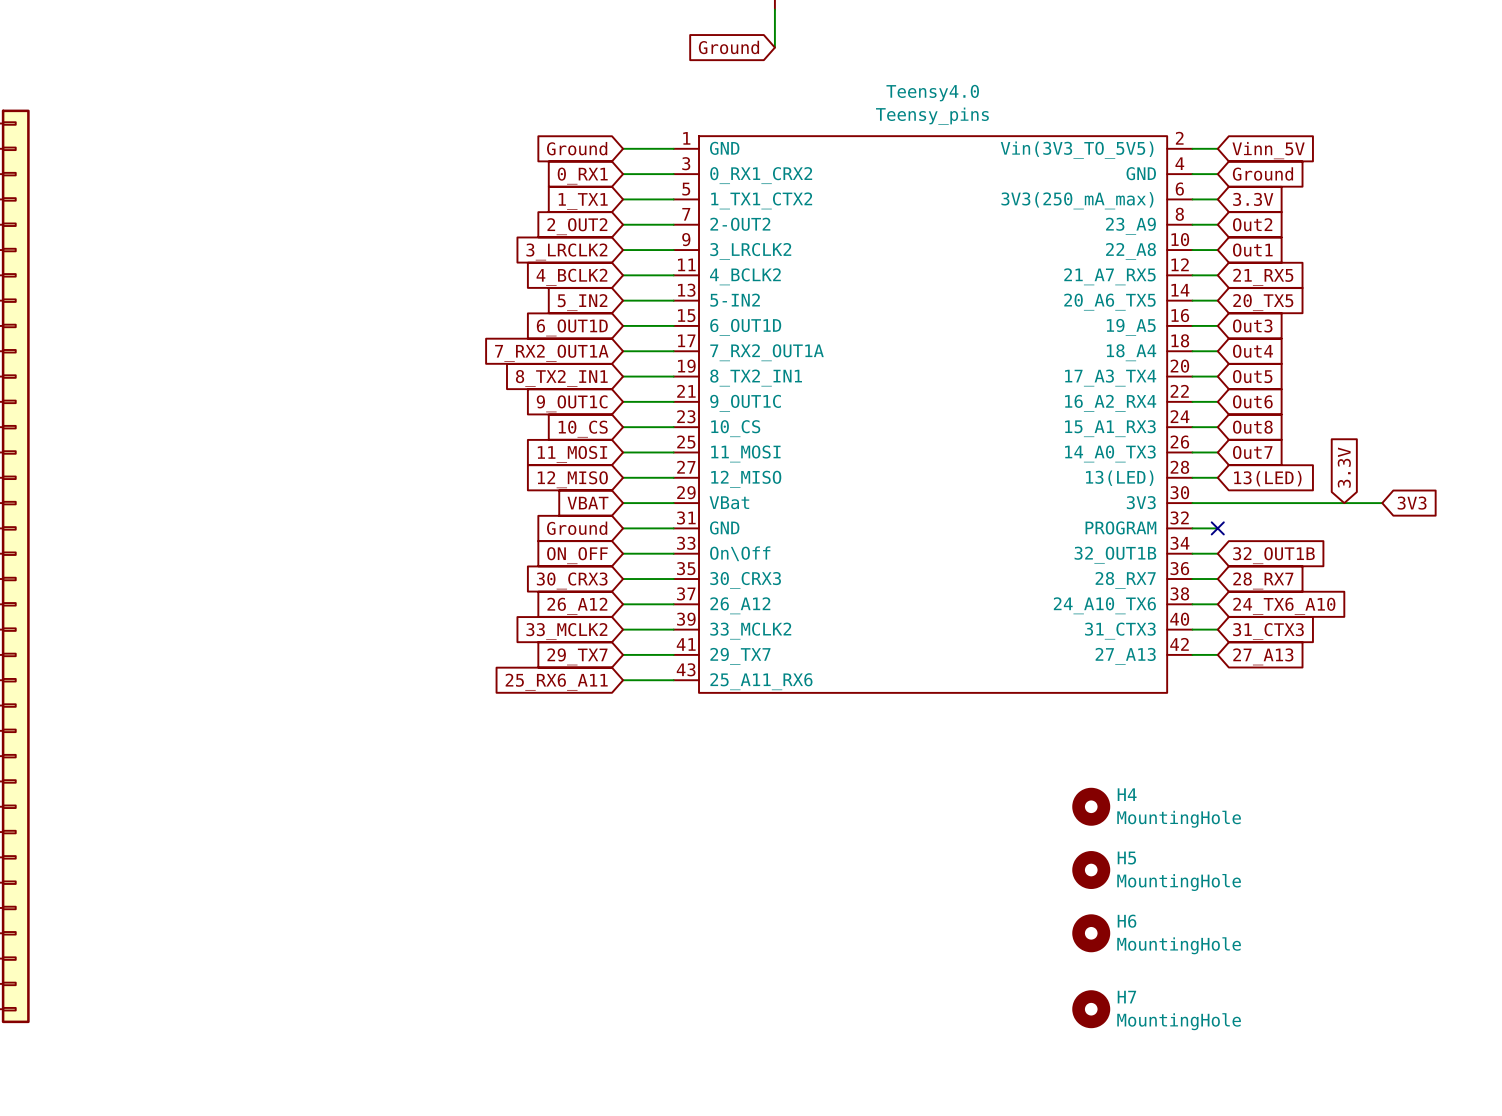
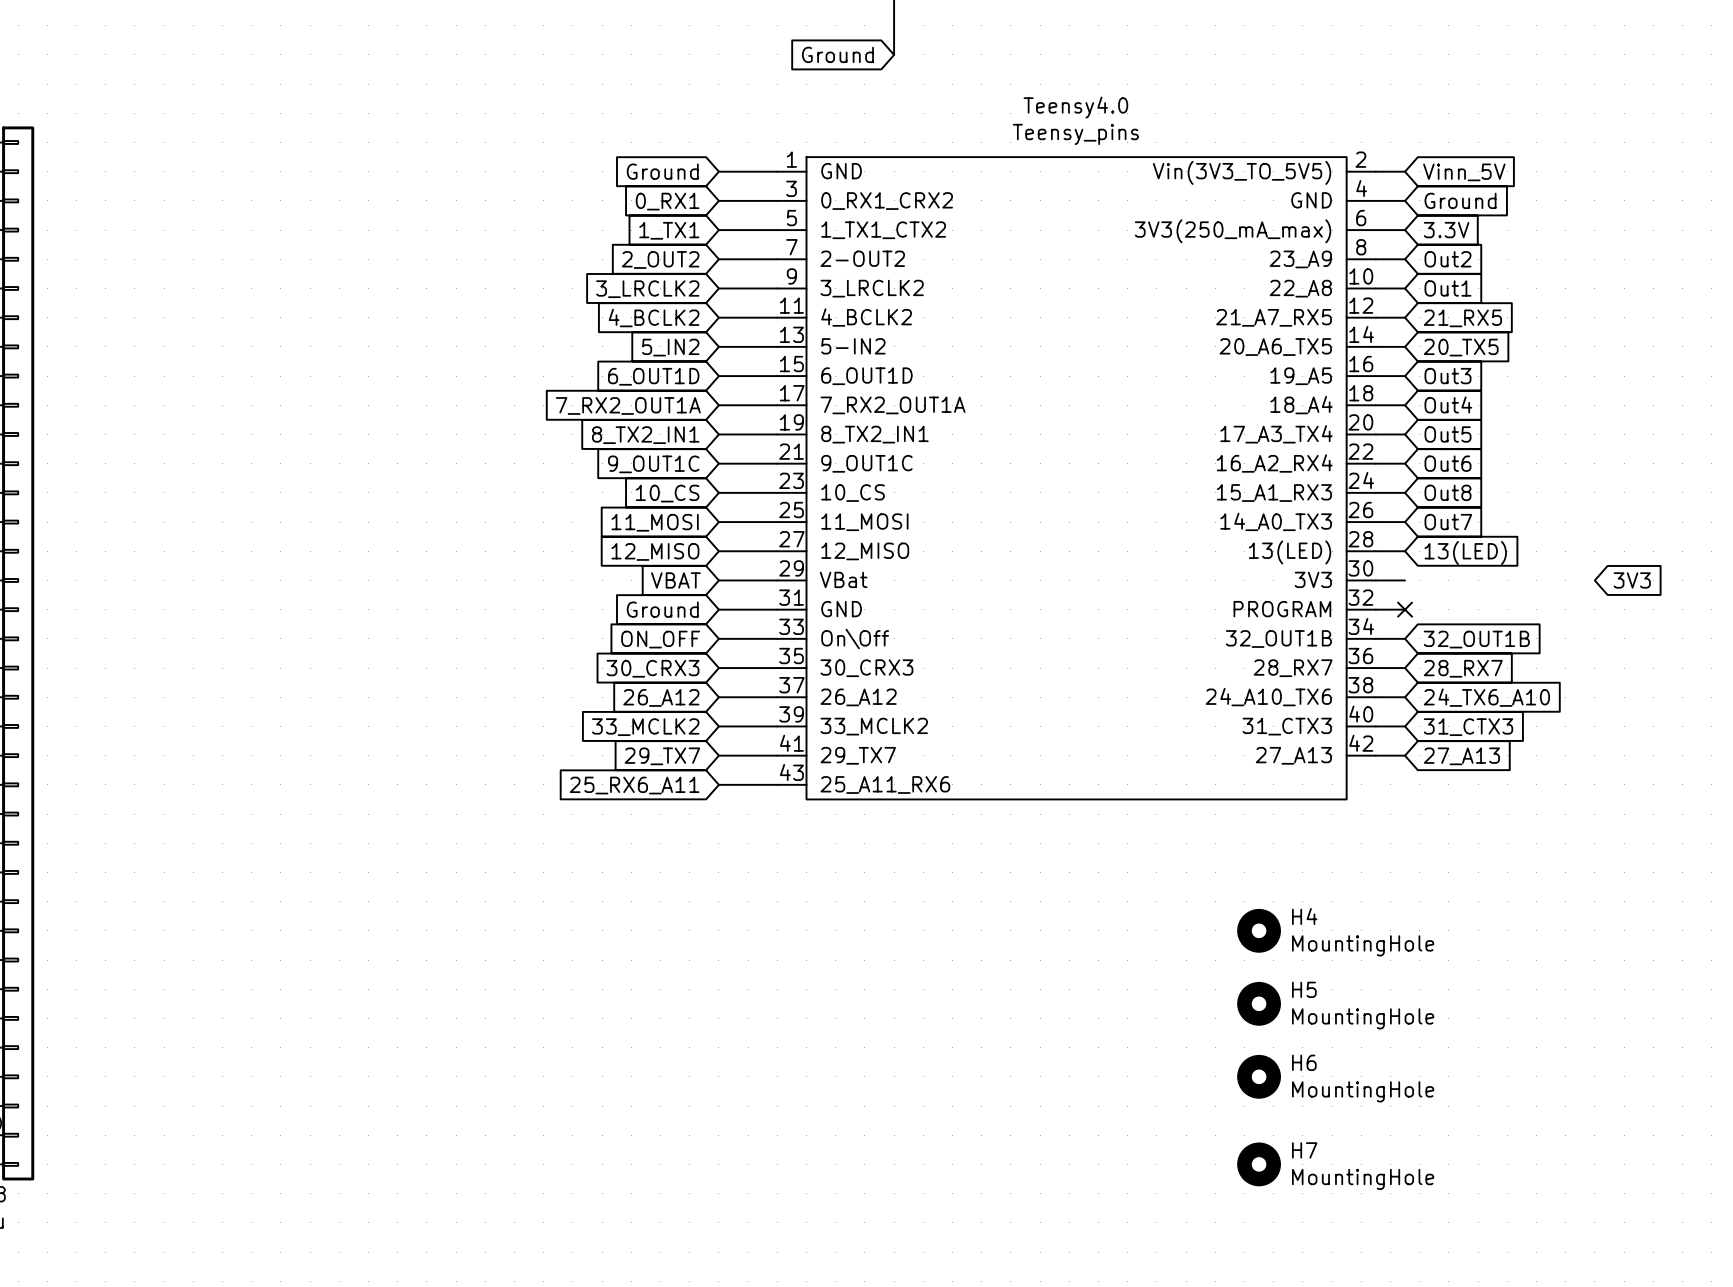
global label: 3.3V (1344, 467) -> none
wire: (1217, 503) (1382, 503) -> none

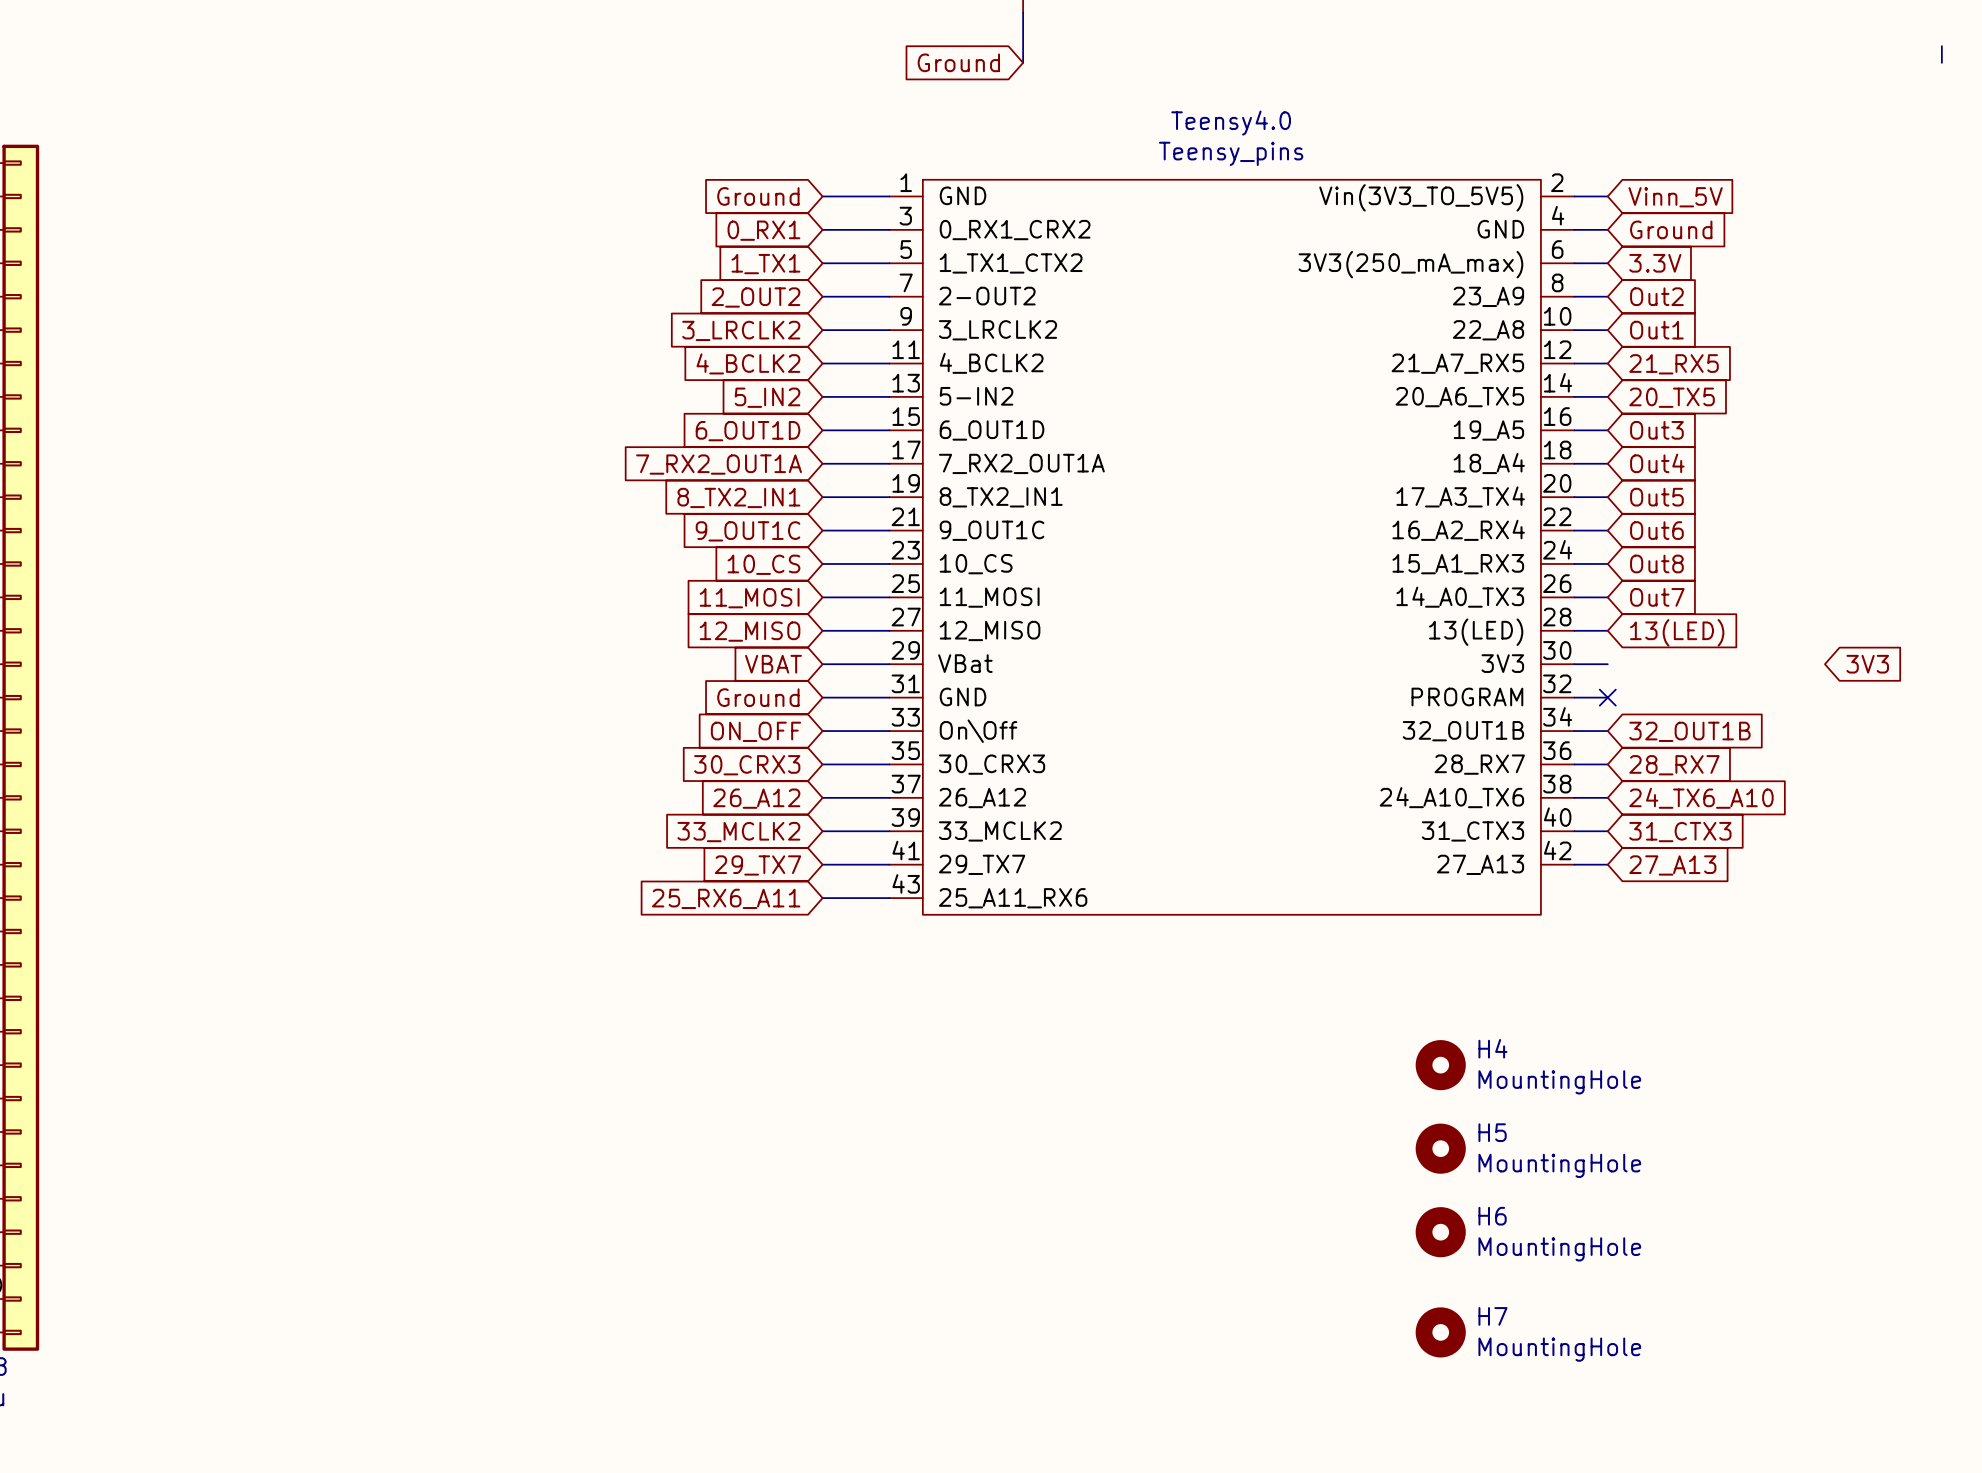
wire: none -> (1941, 46) (1941, 62)

